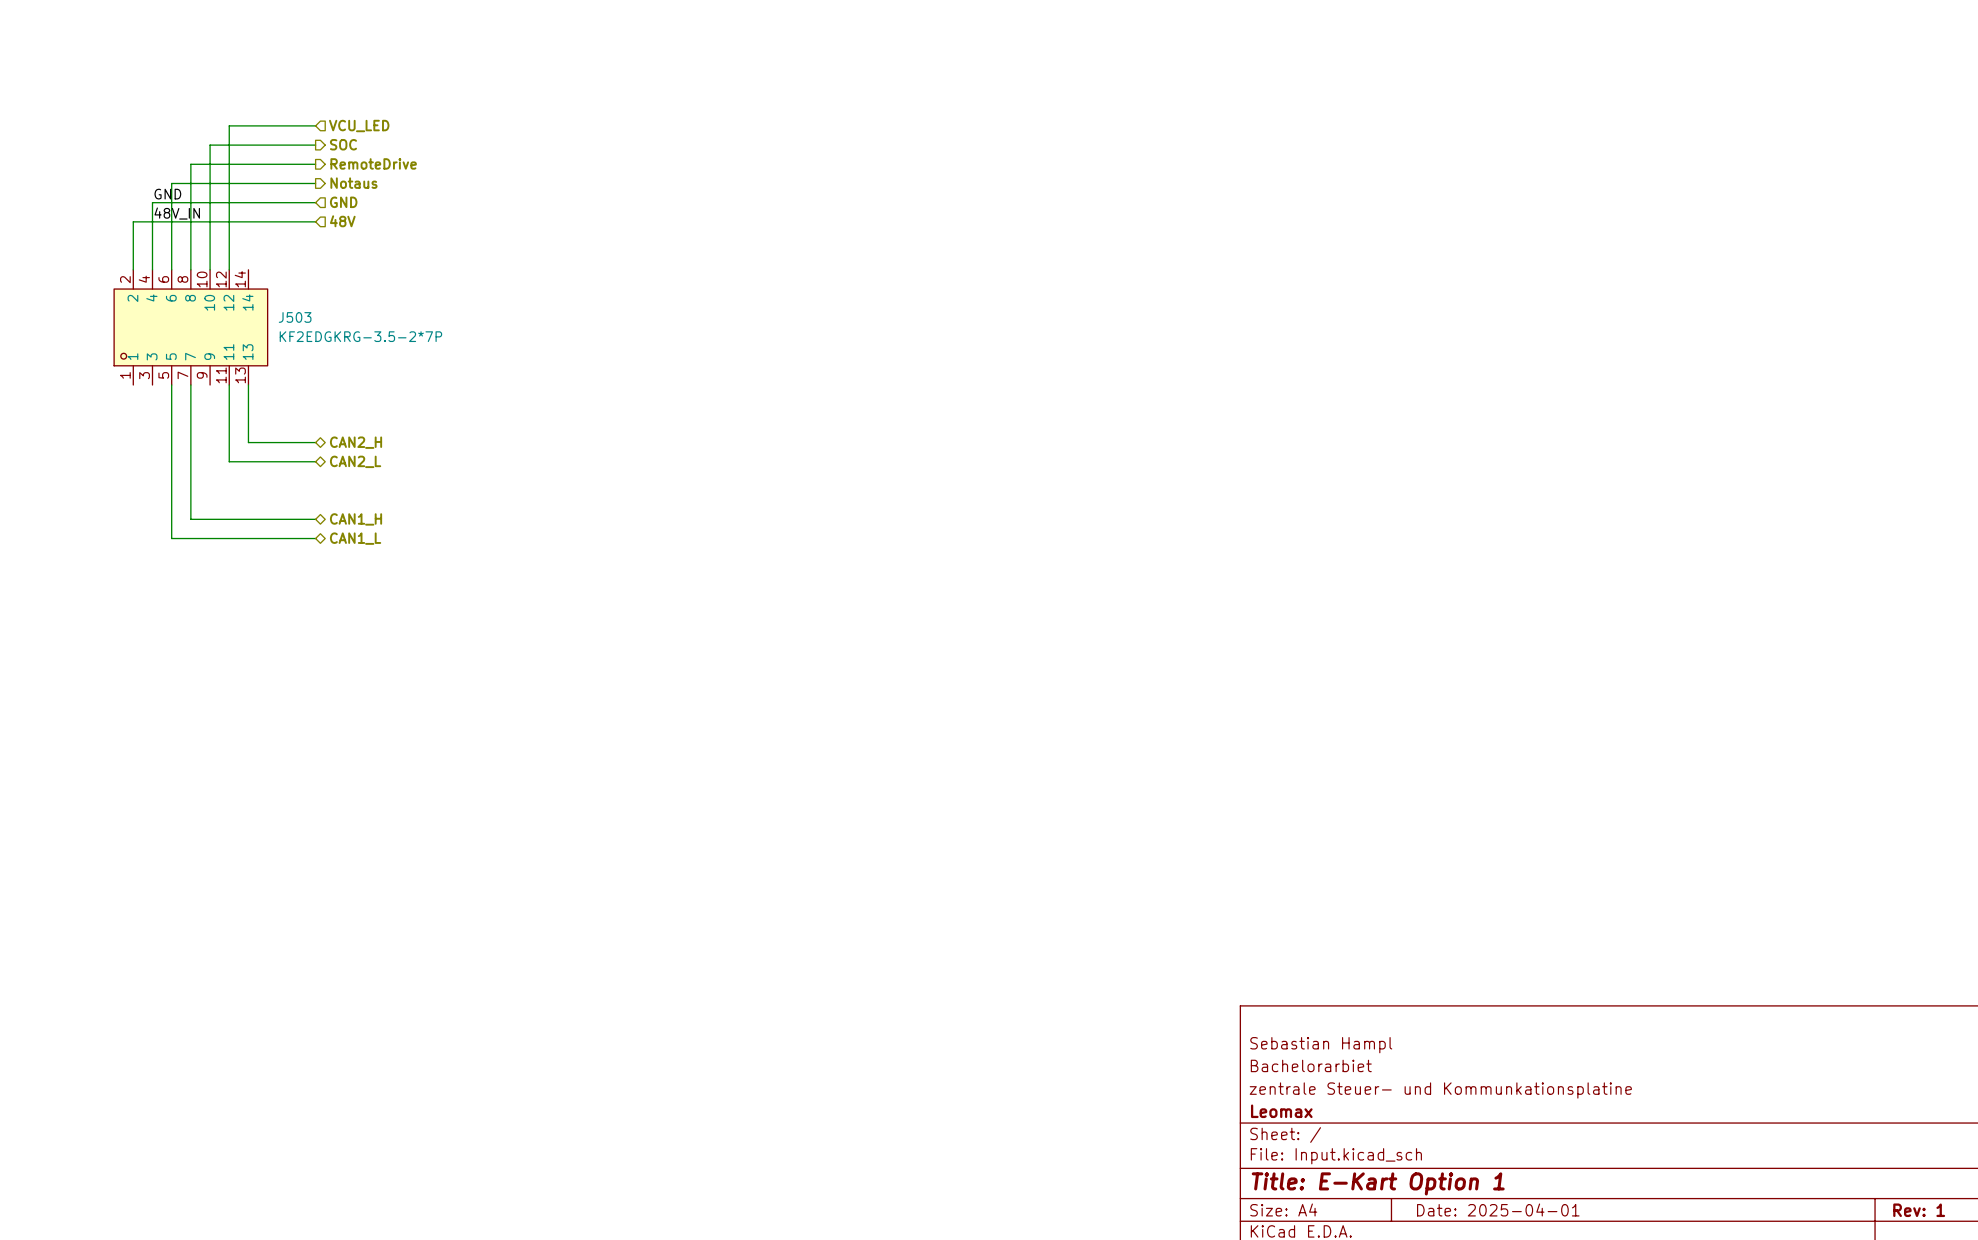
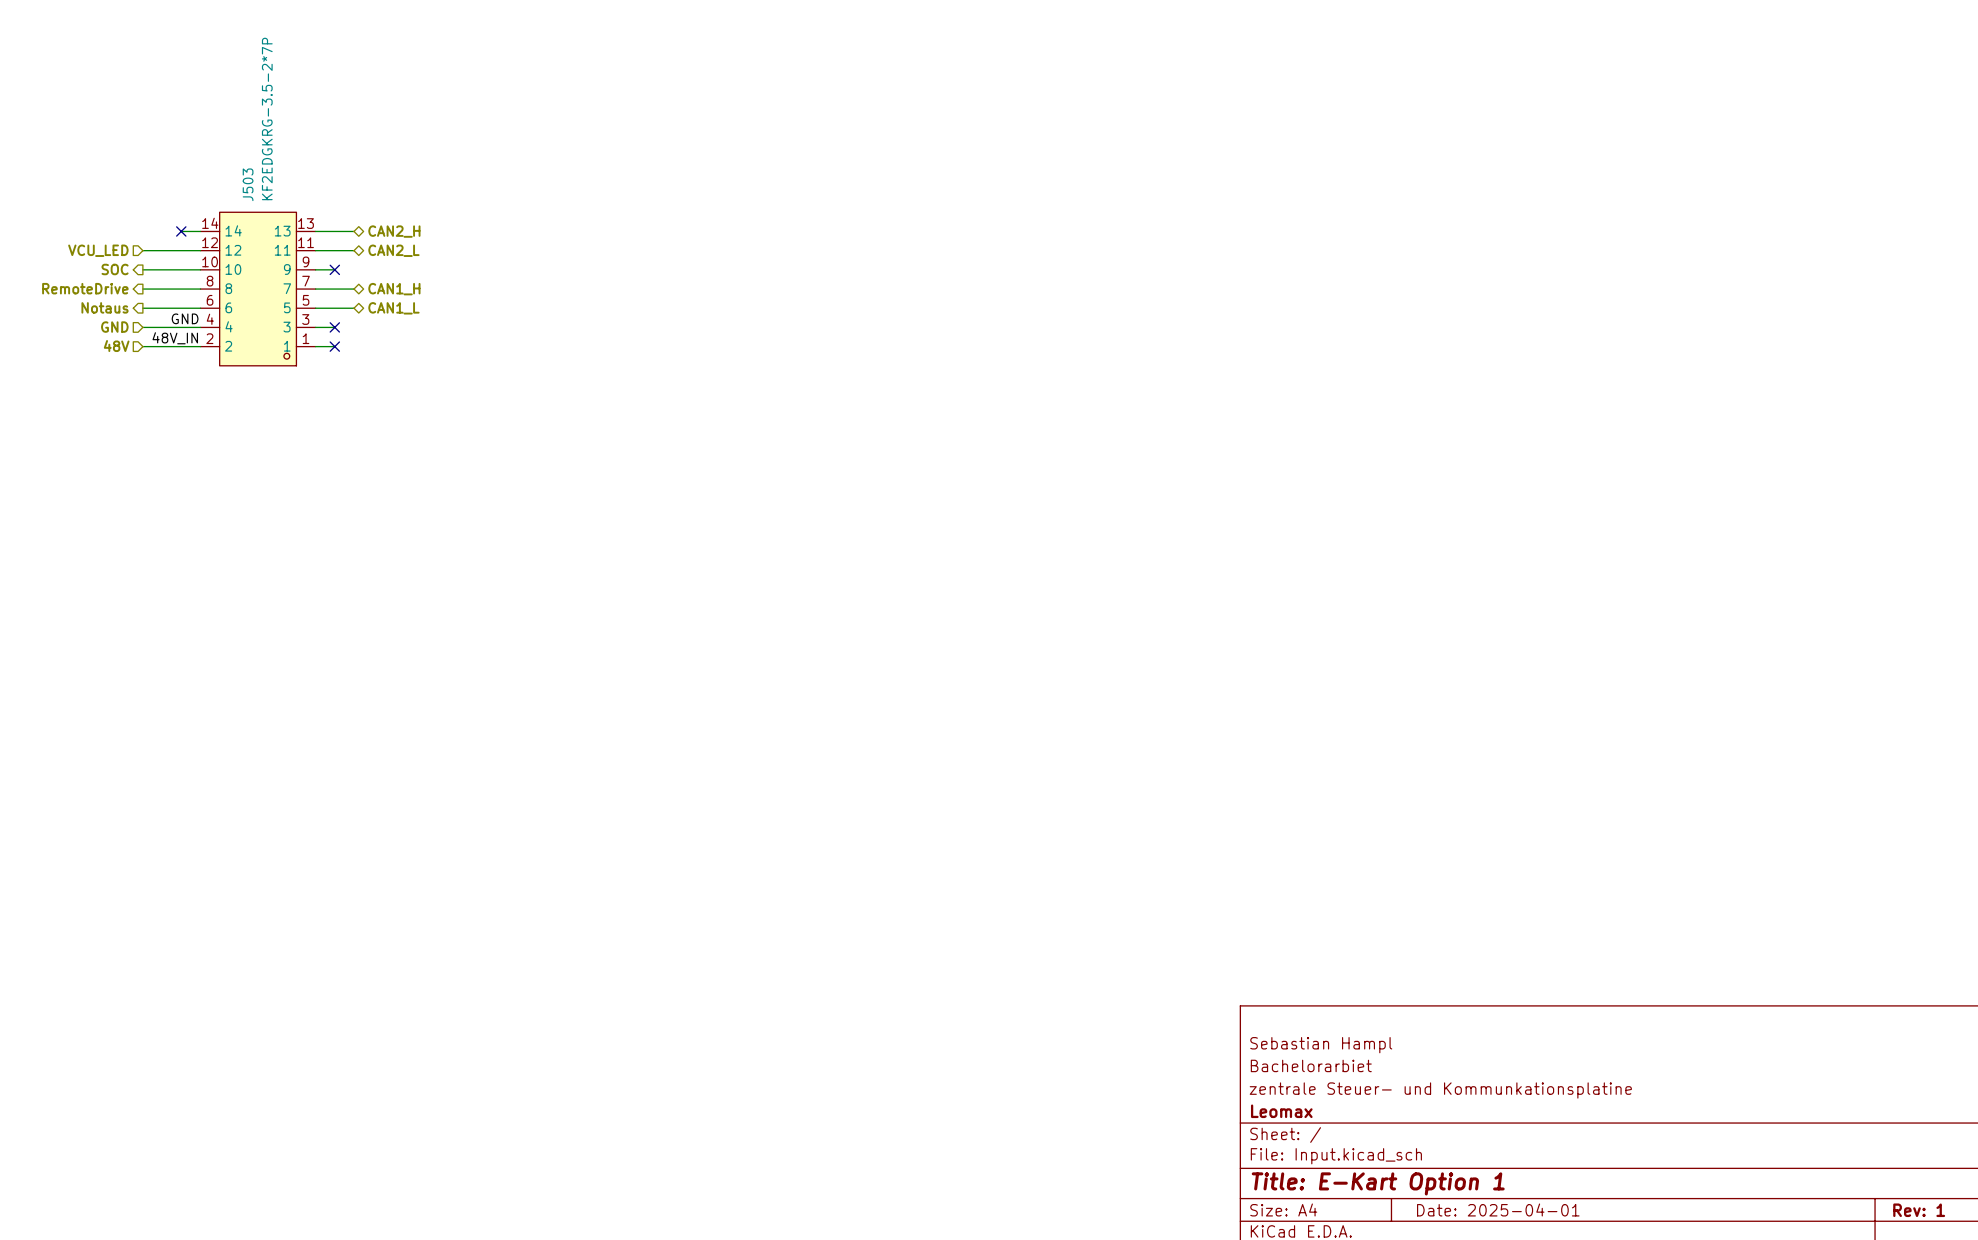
wire: (315, 125) (229, 125) (229, 269) -> none
hierarchical label: VCU_LED (359, 126) -> none
hierarchical label: SOC (343, 144) -> none
wire: (315, 145) (210, 145) (210, 269) -> none
hierarchical label: RemoteDrive (373, 163) -> none
wire: (315, 164) (190, 164) (190, 269) -> none
wire: (315, 183) (171, 183) (171, 269) -> none
hierarchical label: Notaus (353, 183) -> none
label position: GND (167, 194) -> GND (185, 318)
wire: (315, 202) (152, 202) (152, 269) -> none
hierarchical label: GND (343, 202) -> none
label position: 48V_IN (177, 213) -> 48V_IN (175, 338)
wire: (315, 221) (133, 221) (133, 269) -> none
hierarchical label: 48V (342, 221) -> none
wire: none -> (181, 231) (200, 231)
no-connect mark: none -> (181, 231)
wire: none -> (315, 231) (354, 231)
hierarchical label: none -> CAN2_H (394, 231)
hierarchical label: none -> VCU_LED (98, 250)
wire: none -> (142, 250) (200, 250)
wire: none -> (315, 250) (354, 250)
hierarchical label: none -> CAN2_L (393, 250)
hierarchical label: none -> SOC (115, 269)
wire: none -> (142, 269) (200, 269)
wire: none -> (315, 269) (334, 269)
no-connect mark: none -> (334, 269)
hierarchical label: none -> RemoteDrive (85, 288)
wire: none -> (315, 289) (354, 289)
hierarchical label: none -> CAN1_H (394, 289)
hierarchical label: none -> Notaus (105, 307)
wire: none -> (315, 308) (354, 308)
hierarchical label: none -> CAN1_L (393, 308)
hierarchical label: none -> GND (114, 327)
J503 rotation: 0° (190, 327) -> 90° counterclockwise (258, 289)
wire: none -> (315, 327) (334, 327)
no-connect mark: none -> (334, 327)
hierarchical label: none -> 48V (116, 346)
wire: none -> (315, 346) (334, 346)
no-connect mark: none -> (334, 346)
wire: (171, 384) (171, 538) (315, 538) -> none
wire: (190, 384) (190, 519) (315, 519) -> none
wire: (229, 384) (229, 461) (315, 461) -> none
wire: (248, 384) (248, 442) (315, 442) -> none
hierarchical label: CAN2_H (356, 442) -> none
hierarchical label: CAN2_L (355, 461) -> none
hierarchical label: CAN1_H (356, 519) -> none
hierarchical label: CAN1_L (355, 538) -> none

